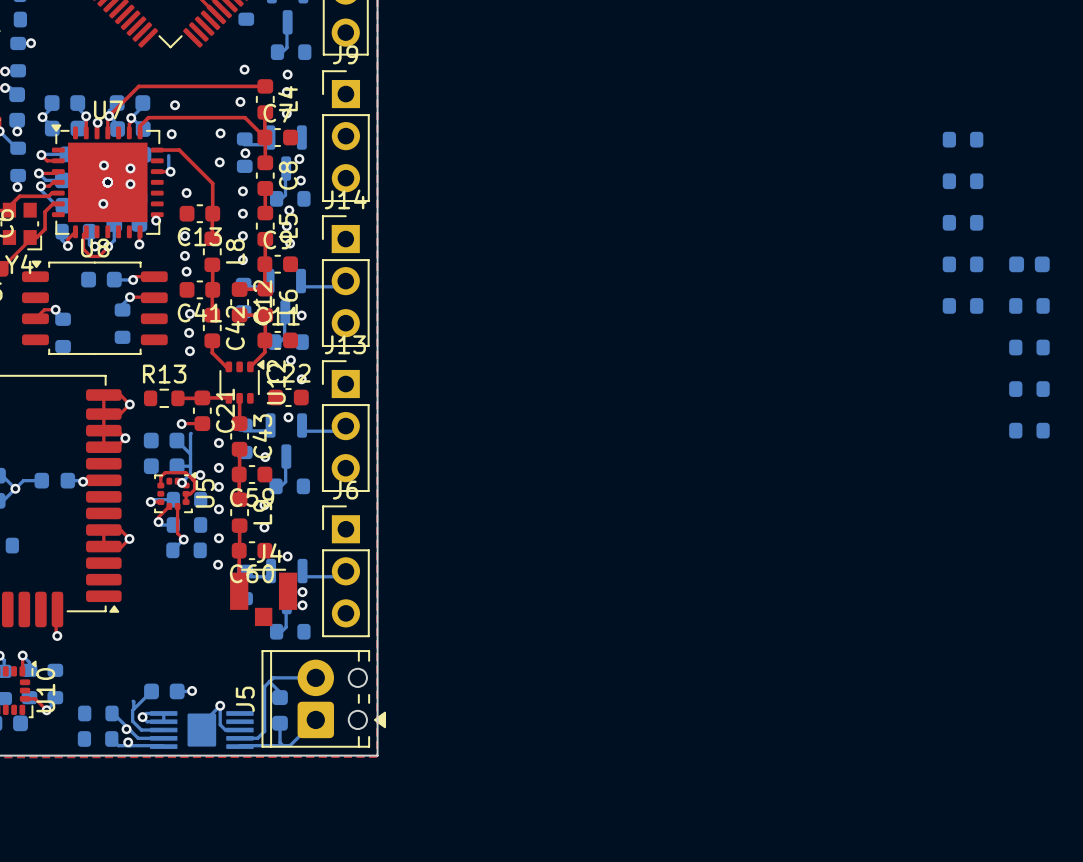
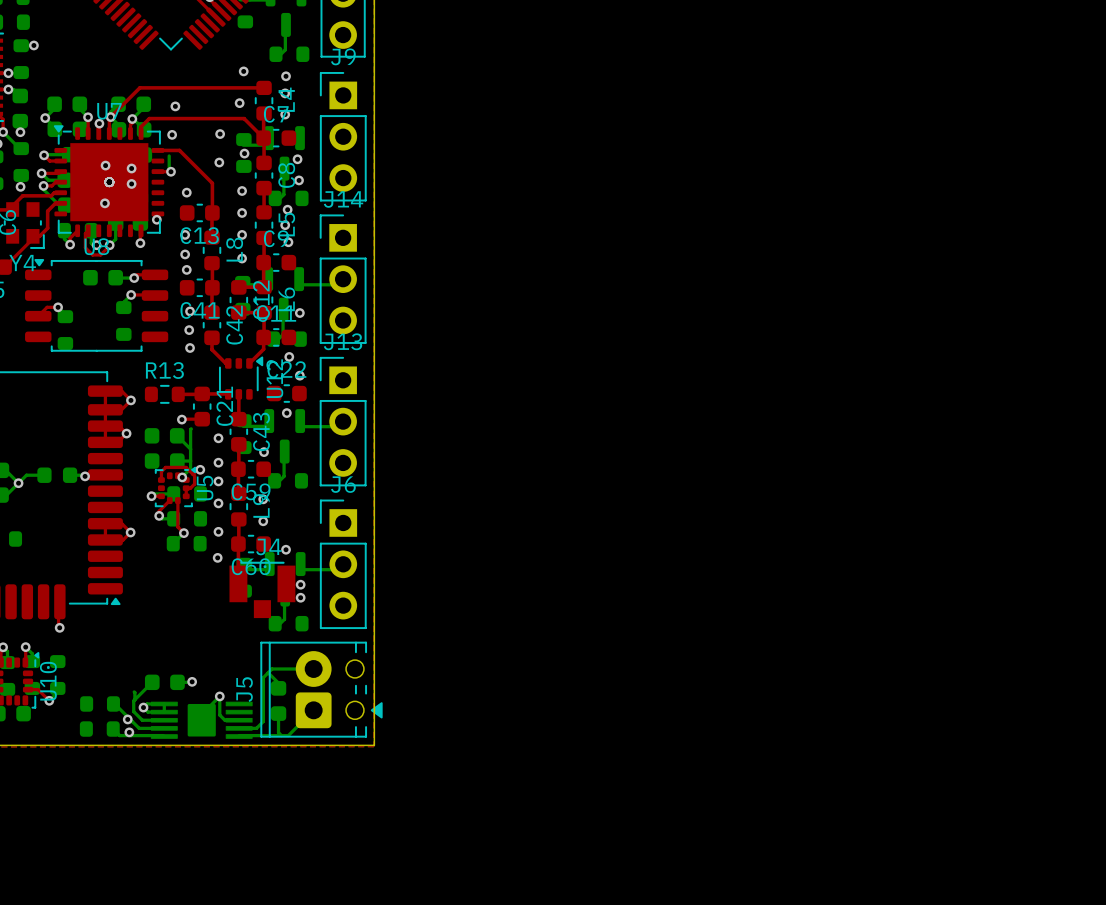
part: (963, 139) -> none
part: (963, 181) -> none
part: (963, 222) -> none
part: (963, 264) -> none
part: (1029, 264) -> none
part: (963, 305) -> none
part: (1029, 305) -> none
part: (1029, 347) -> none
part: (1029, 389) -> none
part: (1029, 430) -> none

